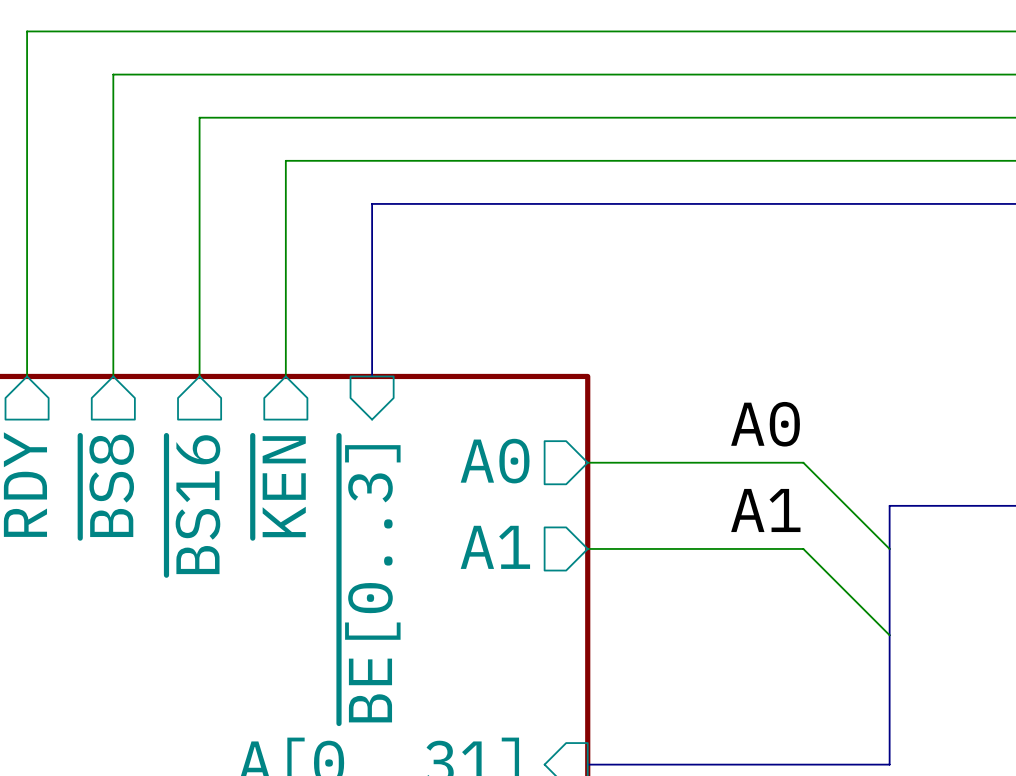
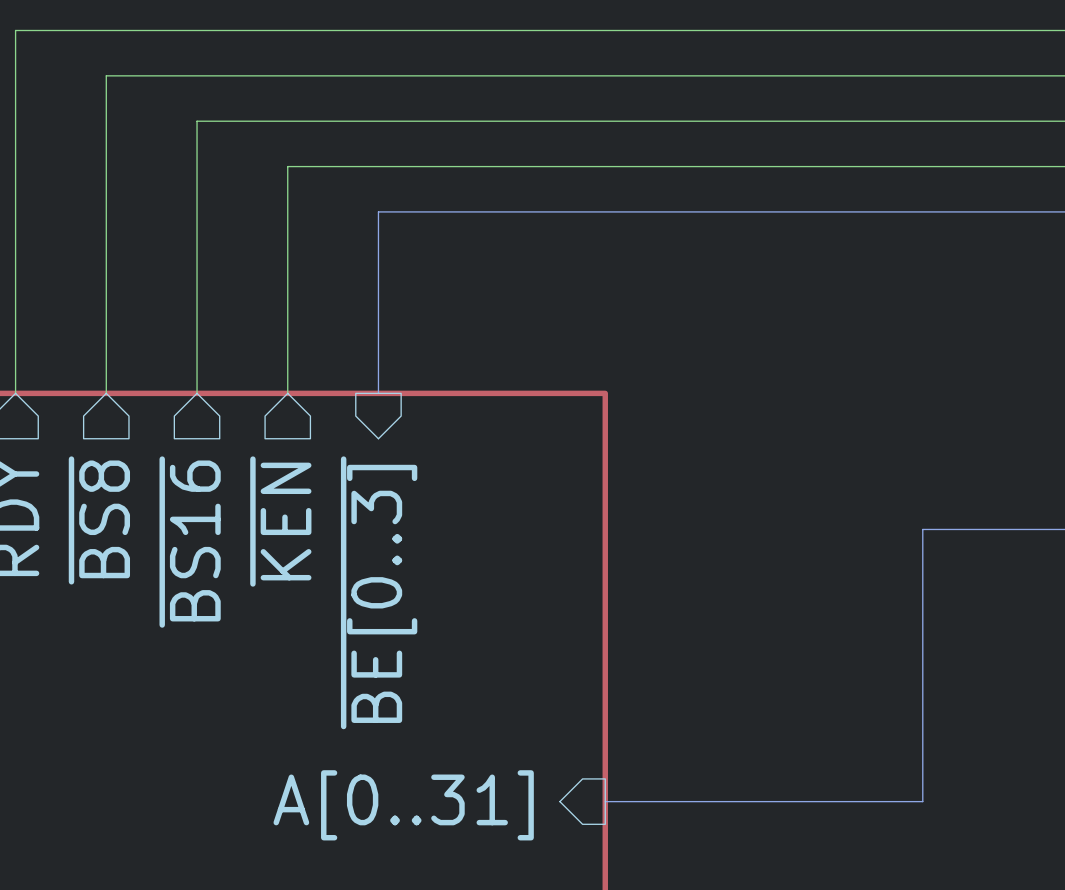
label: A0 (765, 424) -> none
sheet pin: A0 (495, 461) -> none
wire: (587, 462) (803, 462) (889, 548) -> none
label: A1 (765, 510) -> none
sheet pin: A1 (495, 547) -> none
wire: (587, 548) (803, 548) (889, 635) -> none

